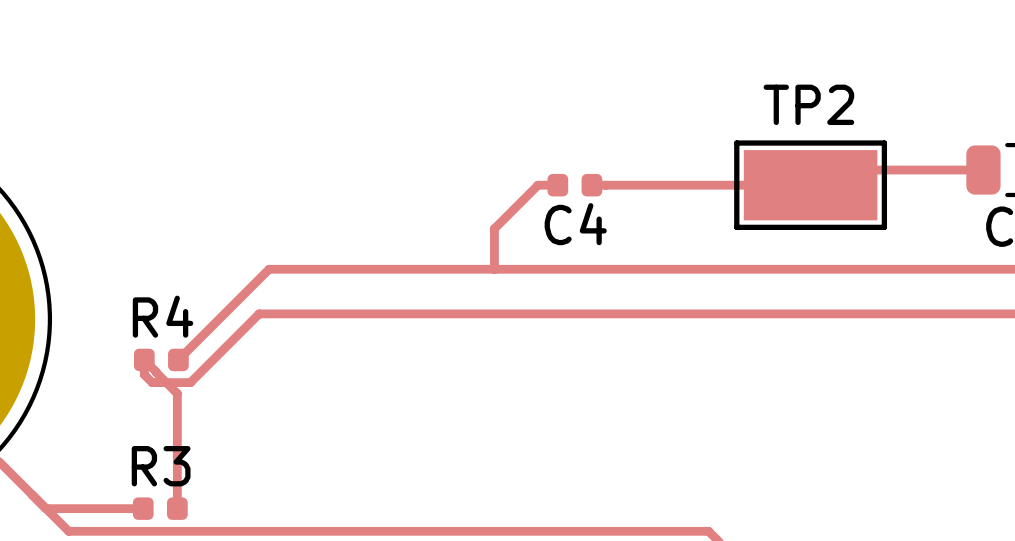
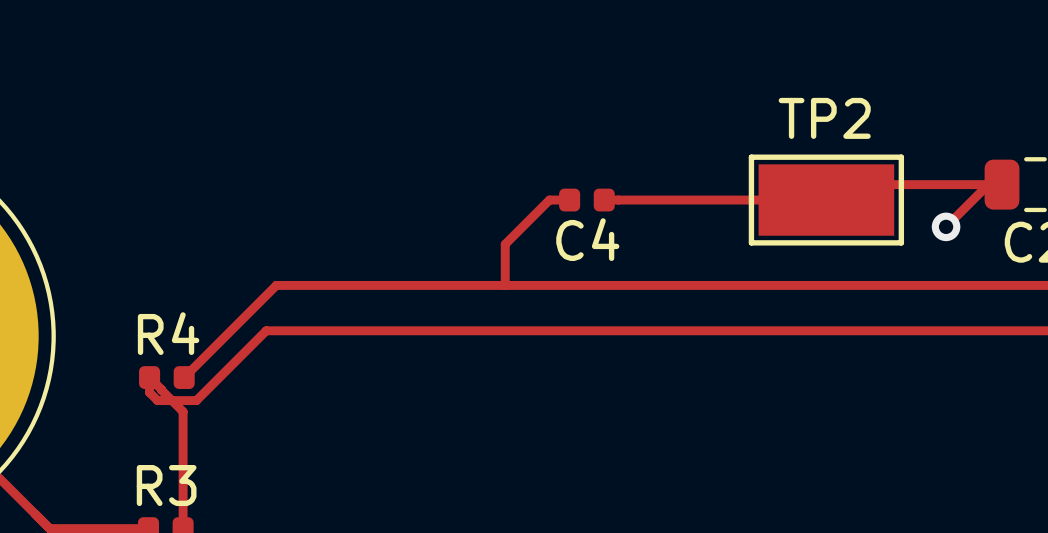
track: none -> (988, 184) (946, 226)
via: none -> (946, 226)

